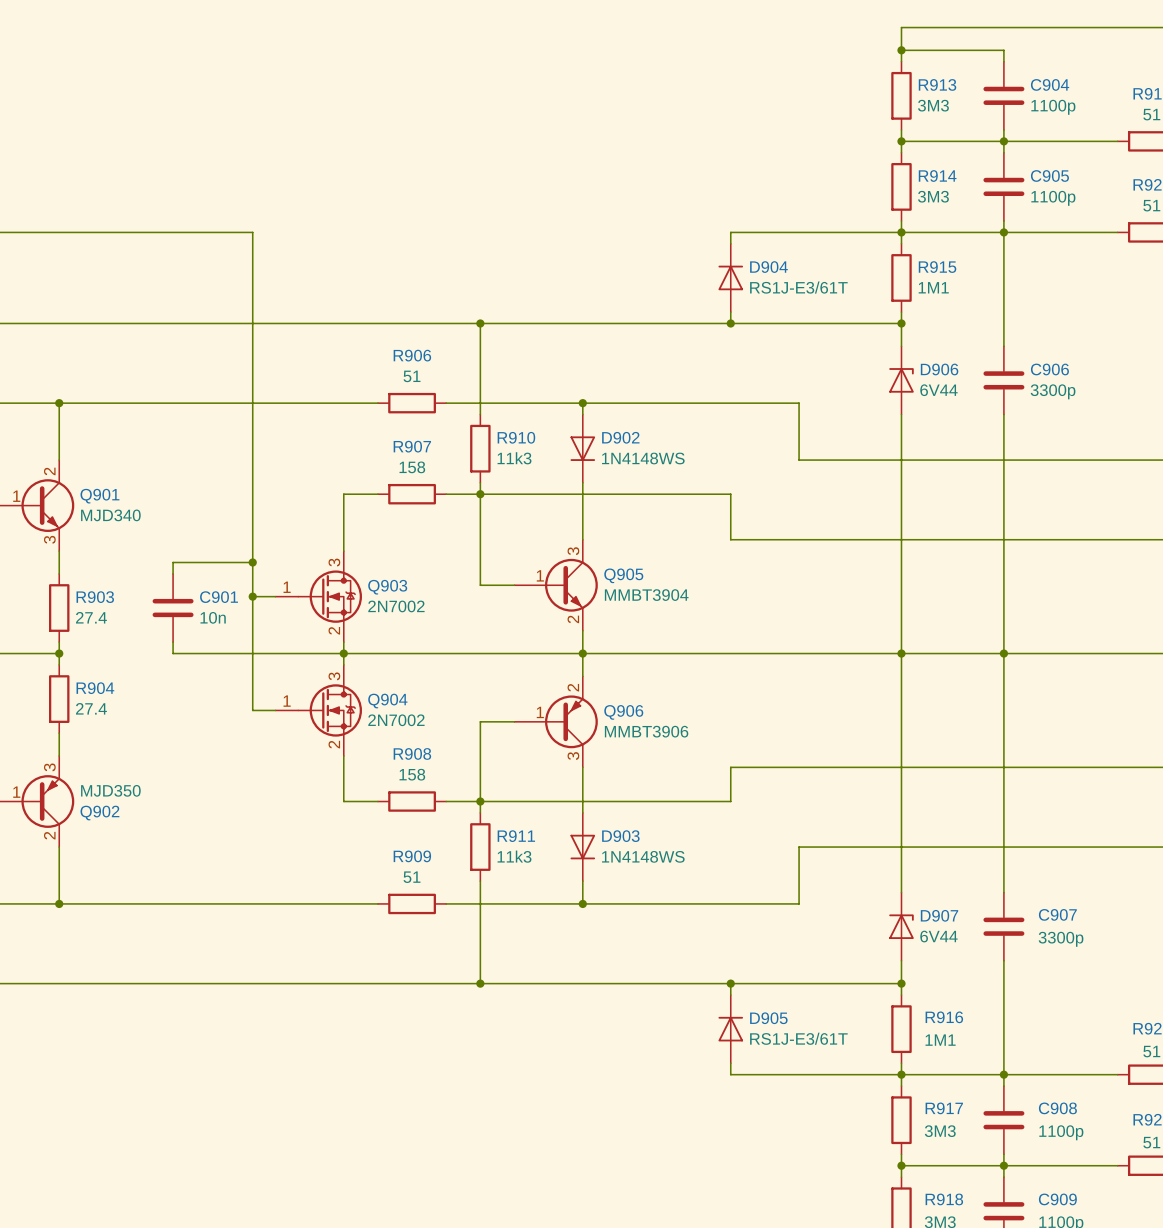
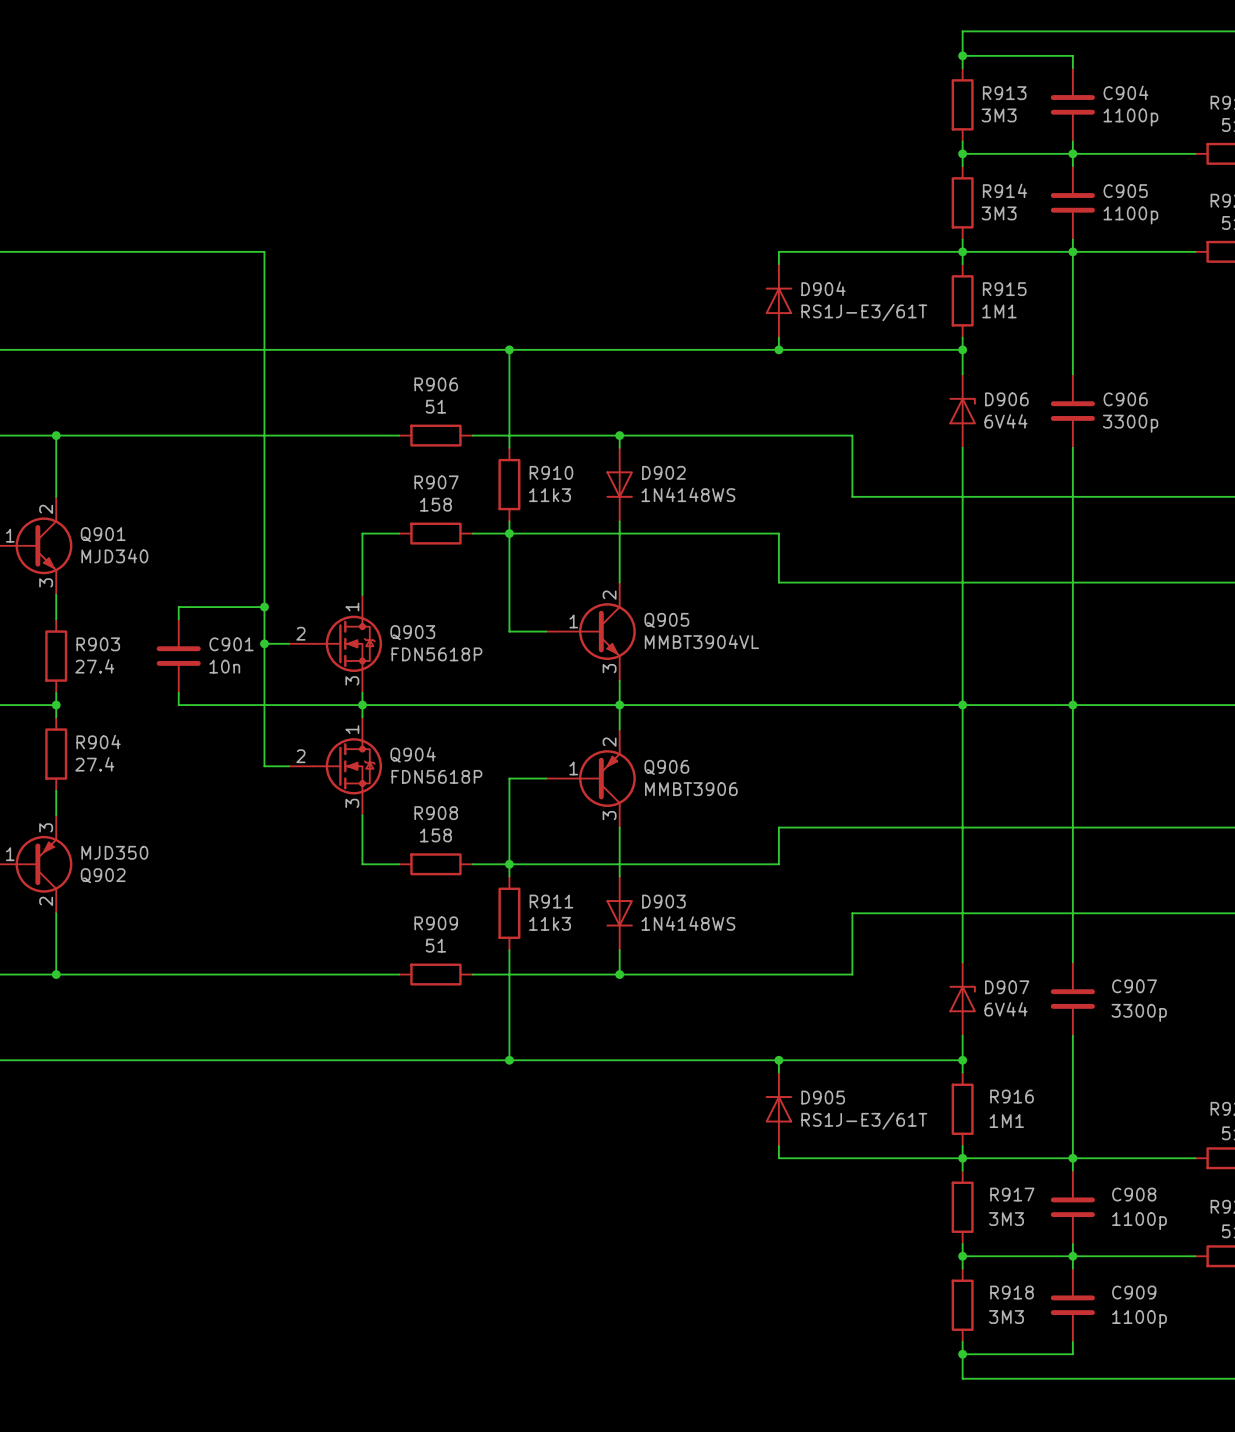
Q905 pin number: 3 (573, 551) -> 2 (609, 595)
Q903 pin number: 3 (334, 562) -> 1 (352, 607)
Q903 pin number: 1 (287, 587) -> 2 (300, 633)
Q905 value: MMBT3904 (646, 595) -> MMBT3904VL (701, 641)
Q903 value: 2N7002 (396, 606) -> FDN5618P (436, 654)
Q905 pin number: 2 (573, 619) -> 3 (609, 668)
Q903 pin number: 2 (334, 630) -> 3 (352, 680)
Q904 pin number: 3 (334, 676) -> 1 (352, 729)
Q904 pin number: 1 (287, 701) -> 2 (300, 756)
Q904 value: 2N7002 (396, 720) -> FDN5618P (436, 776)
Q904 pin number: 2 (334, 744) -> 3 (352, 803)

